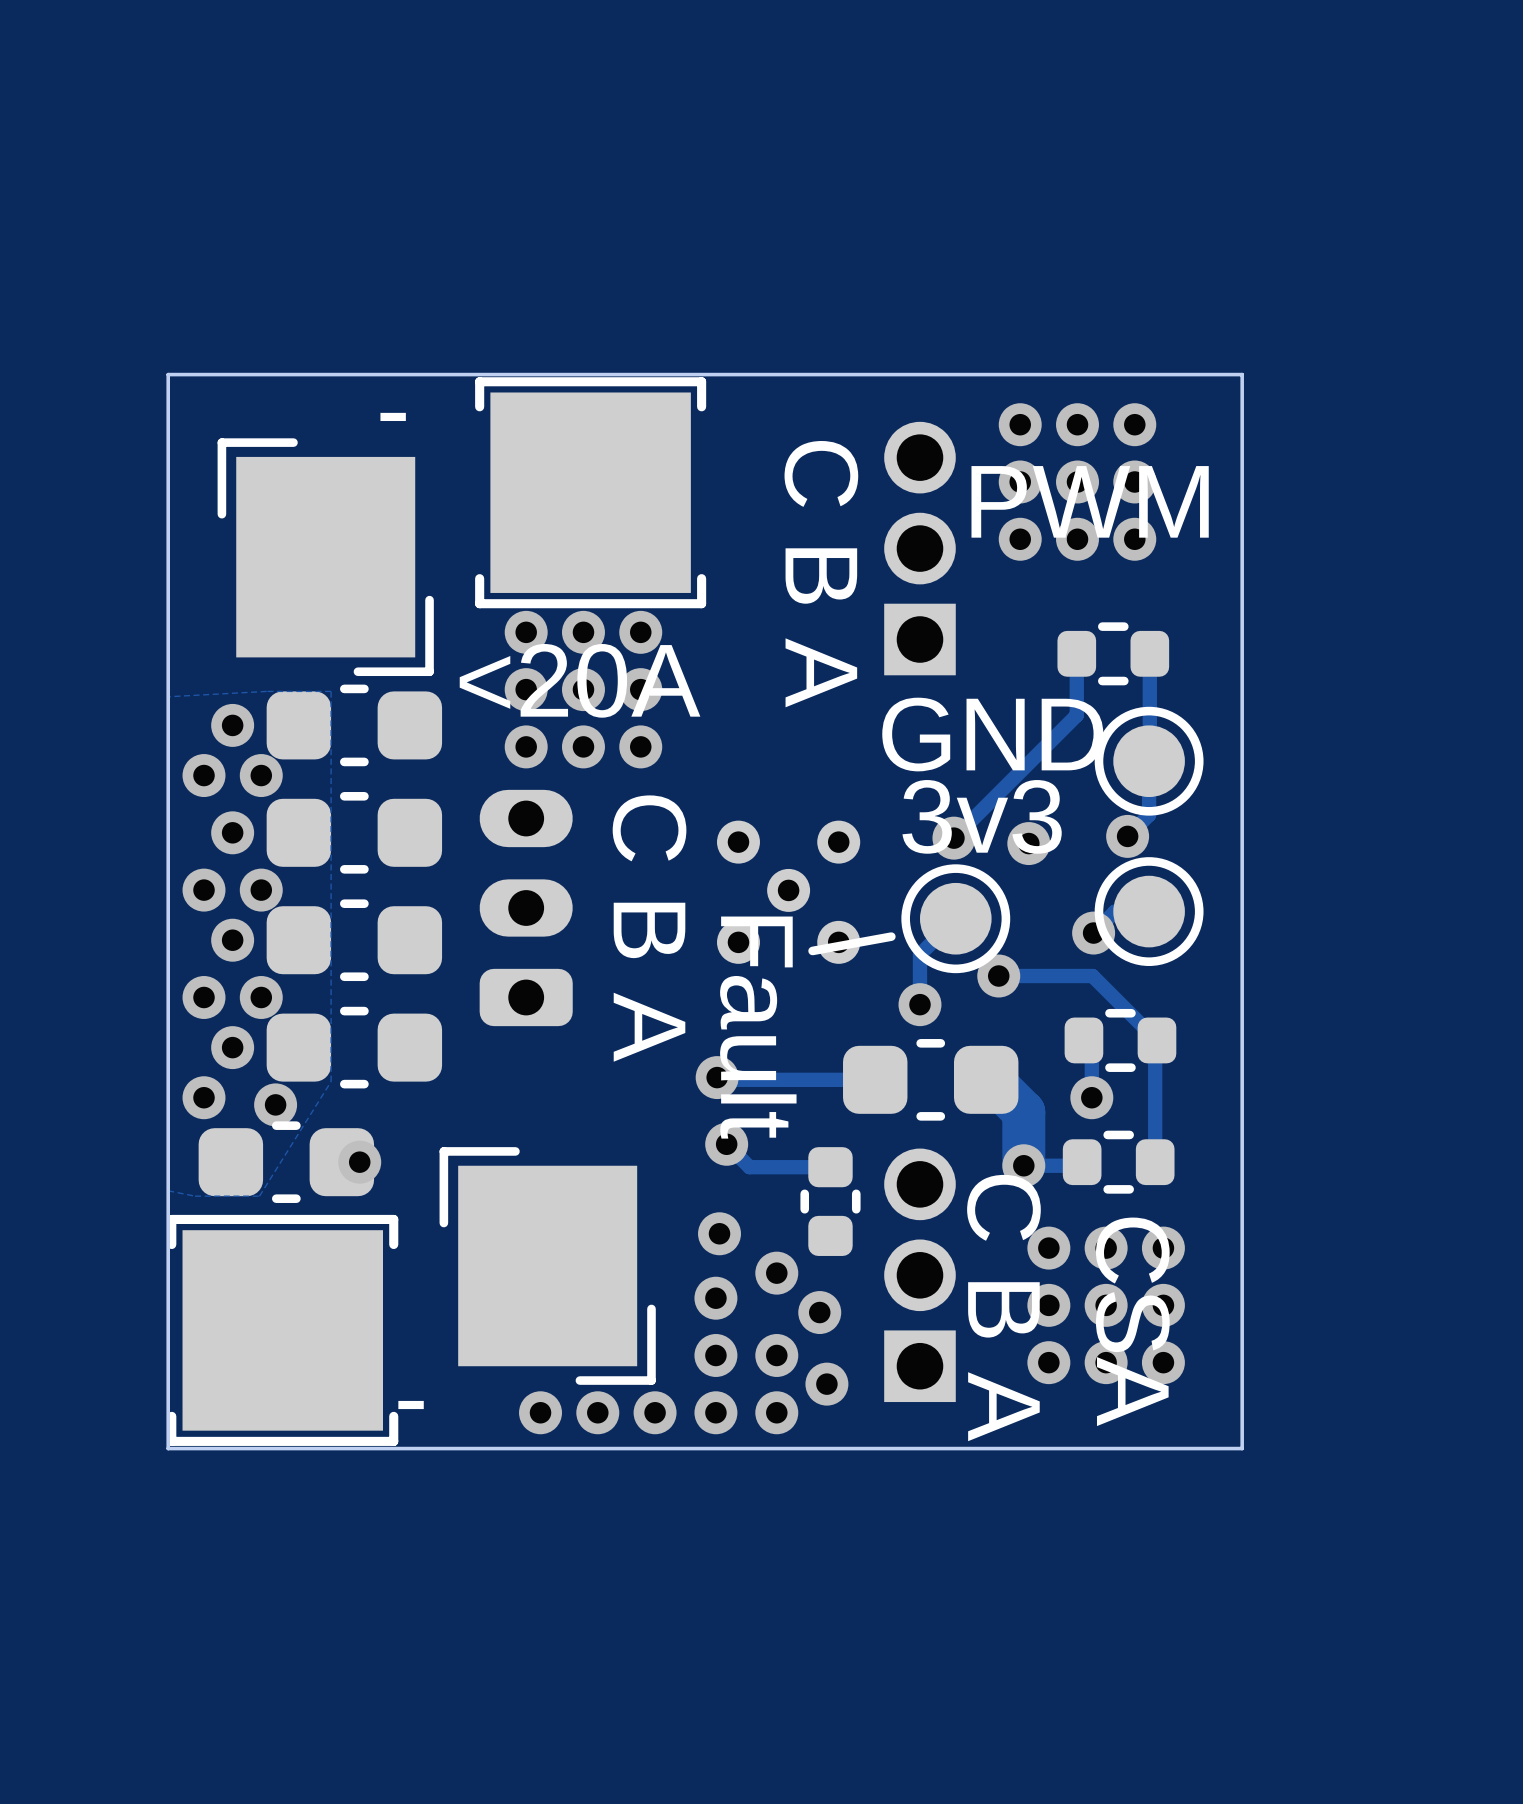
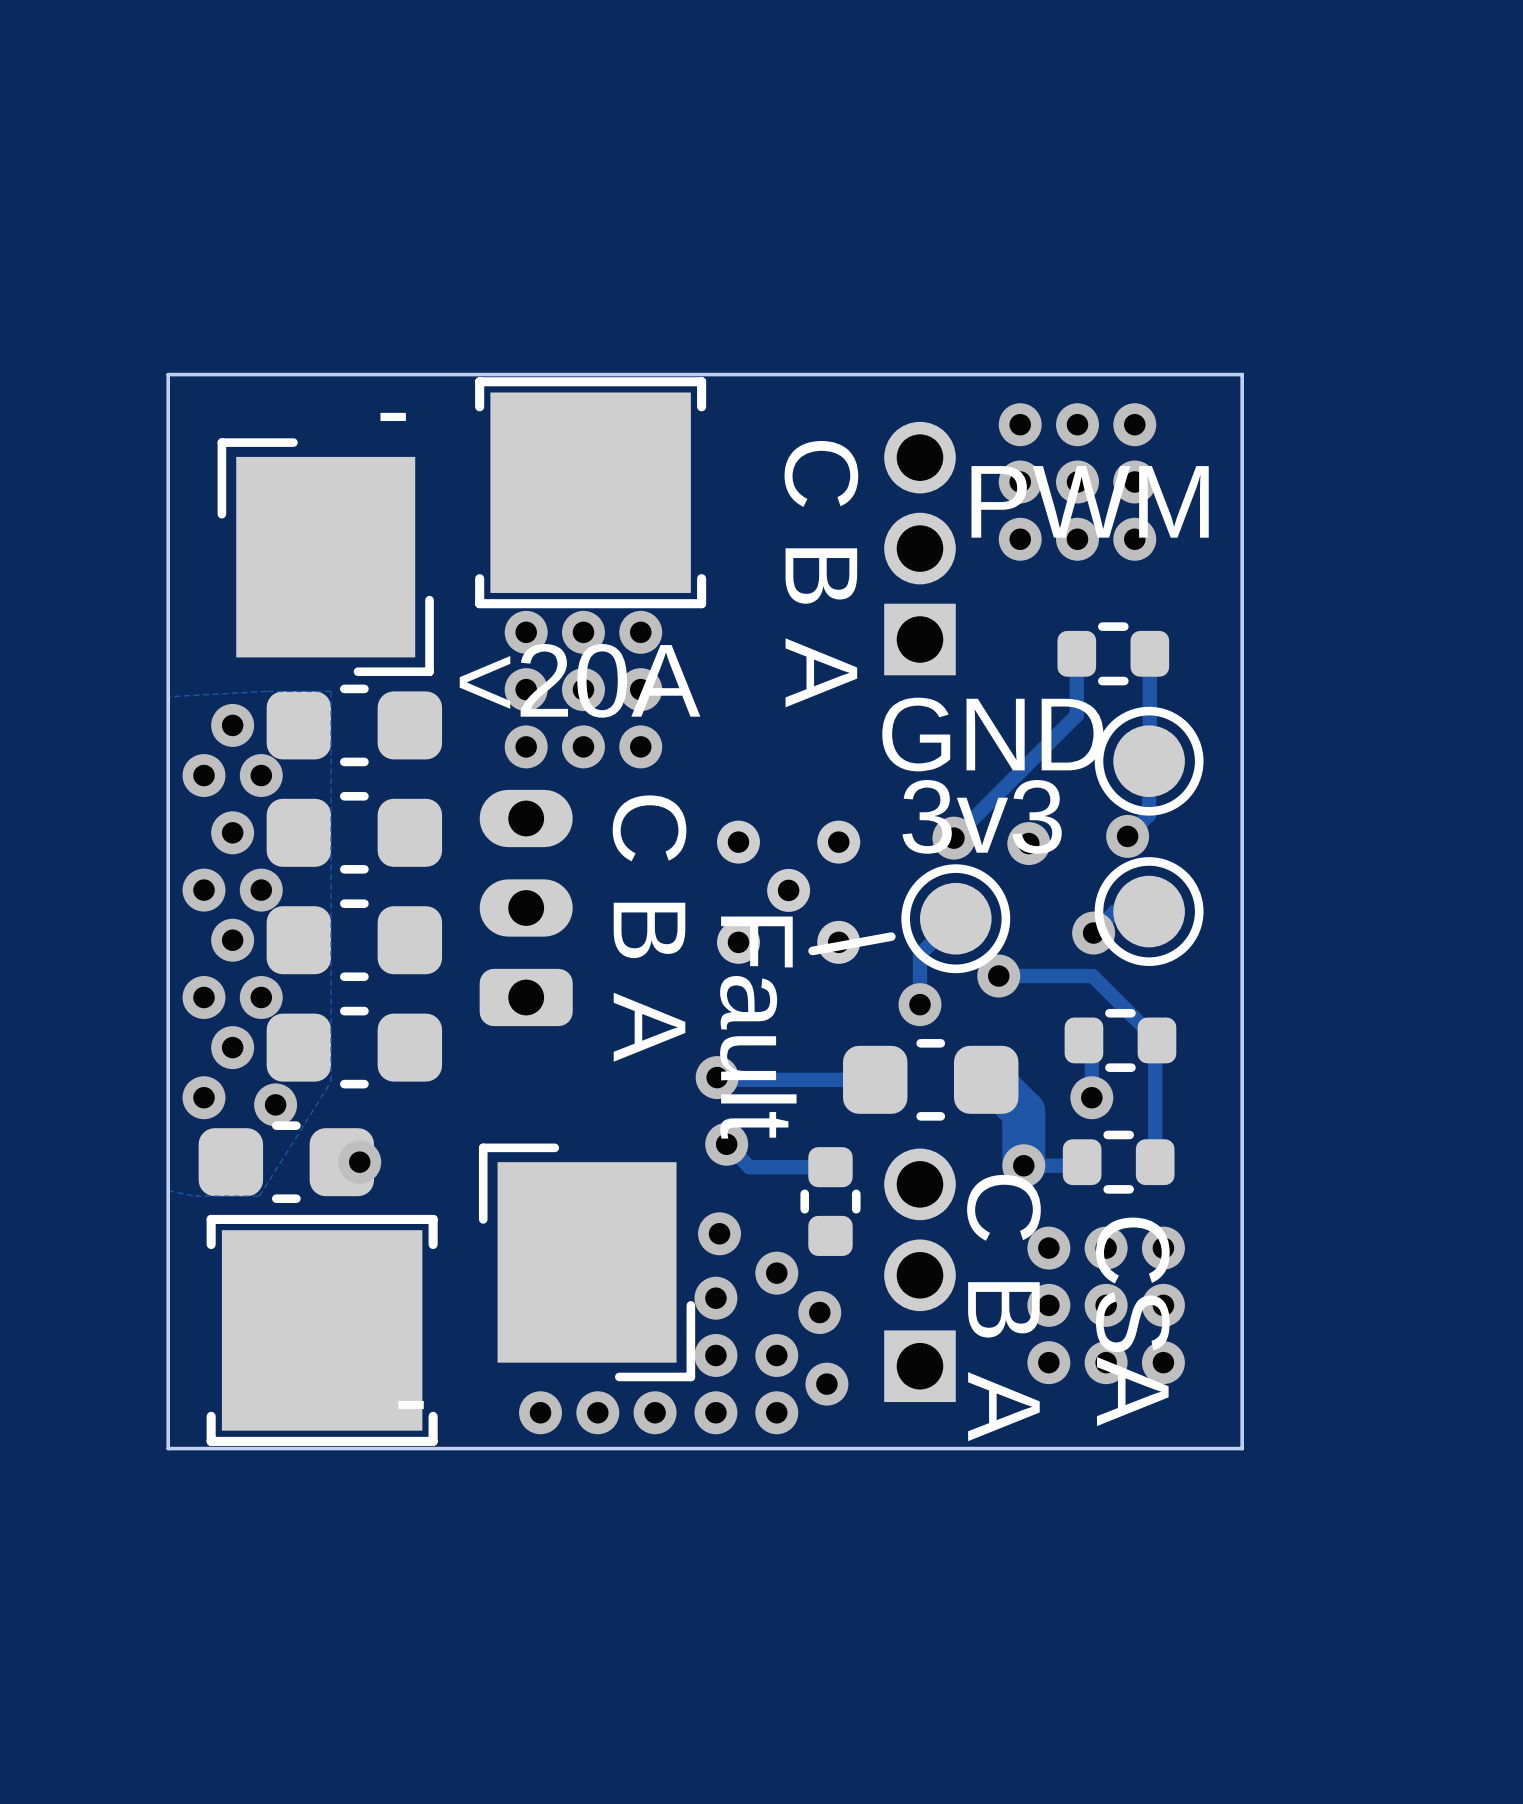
part position: (547, 1265) -> (587, 1262)
part position: (282, 1330) -> (322, 1330)

